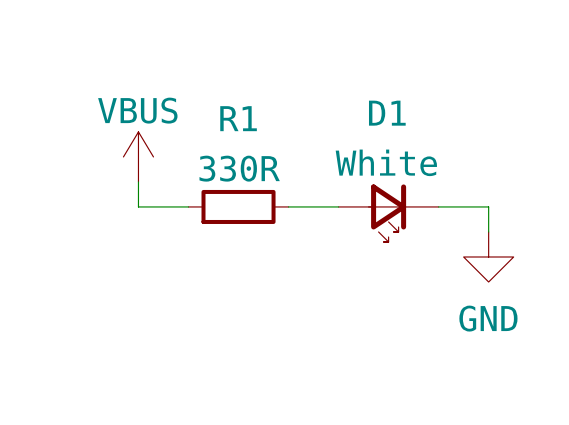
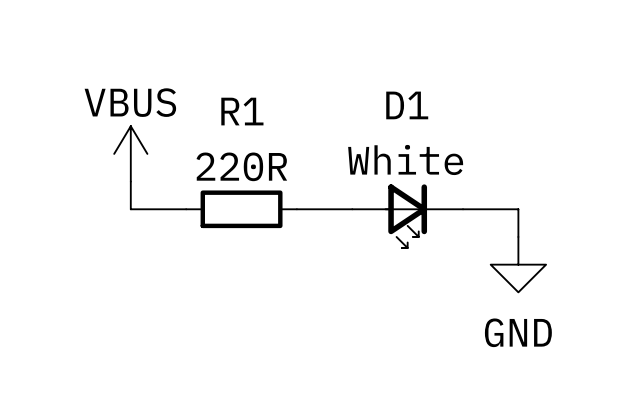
R1 value: 330R (239, 168) -> 220R (241, 166)

